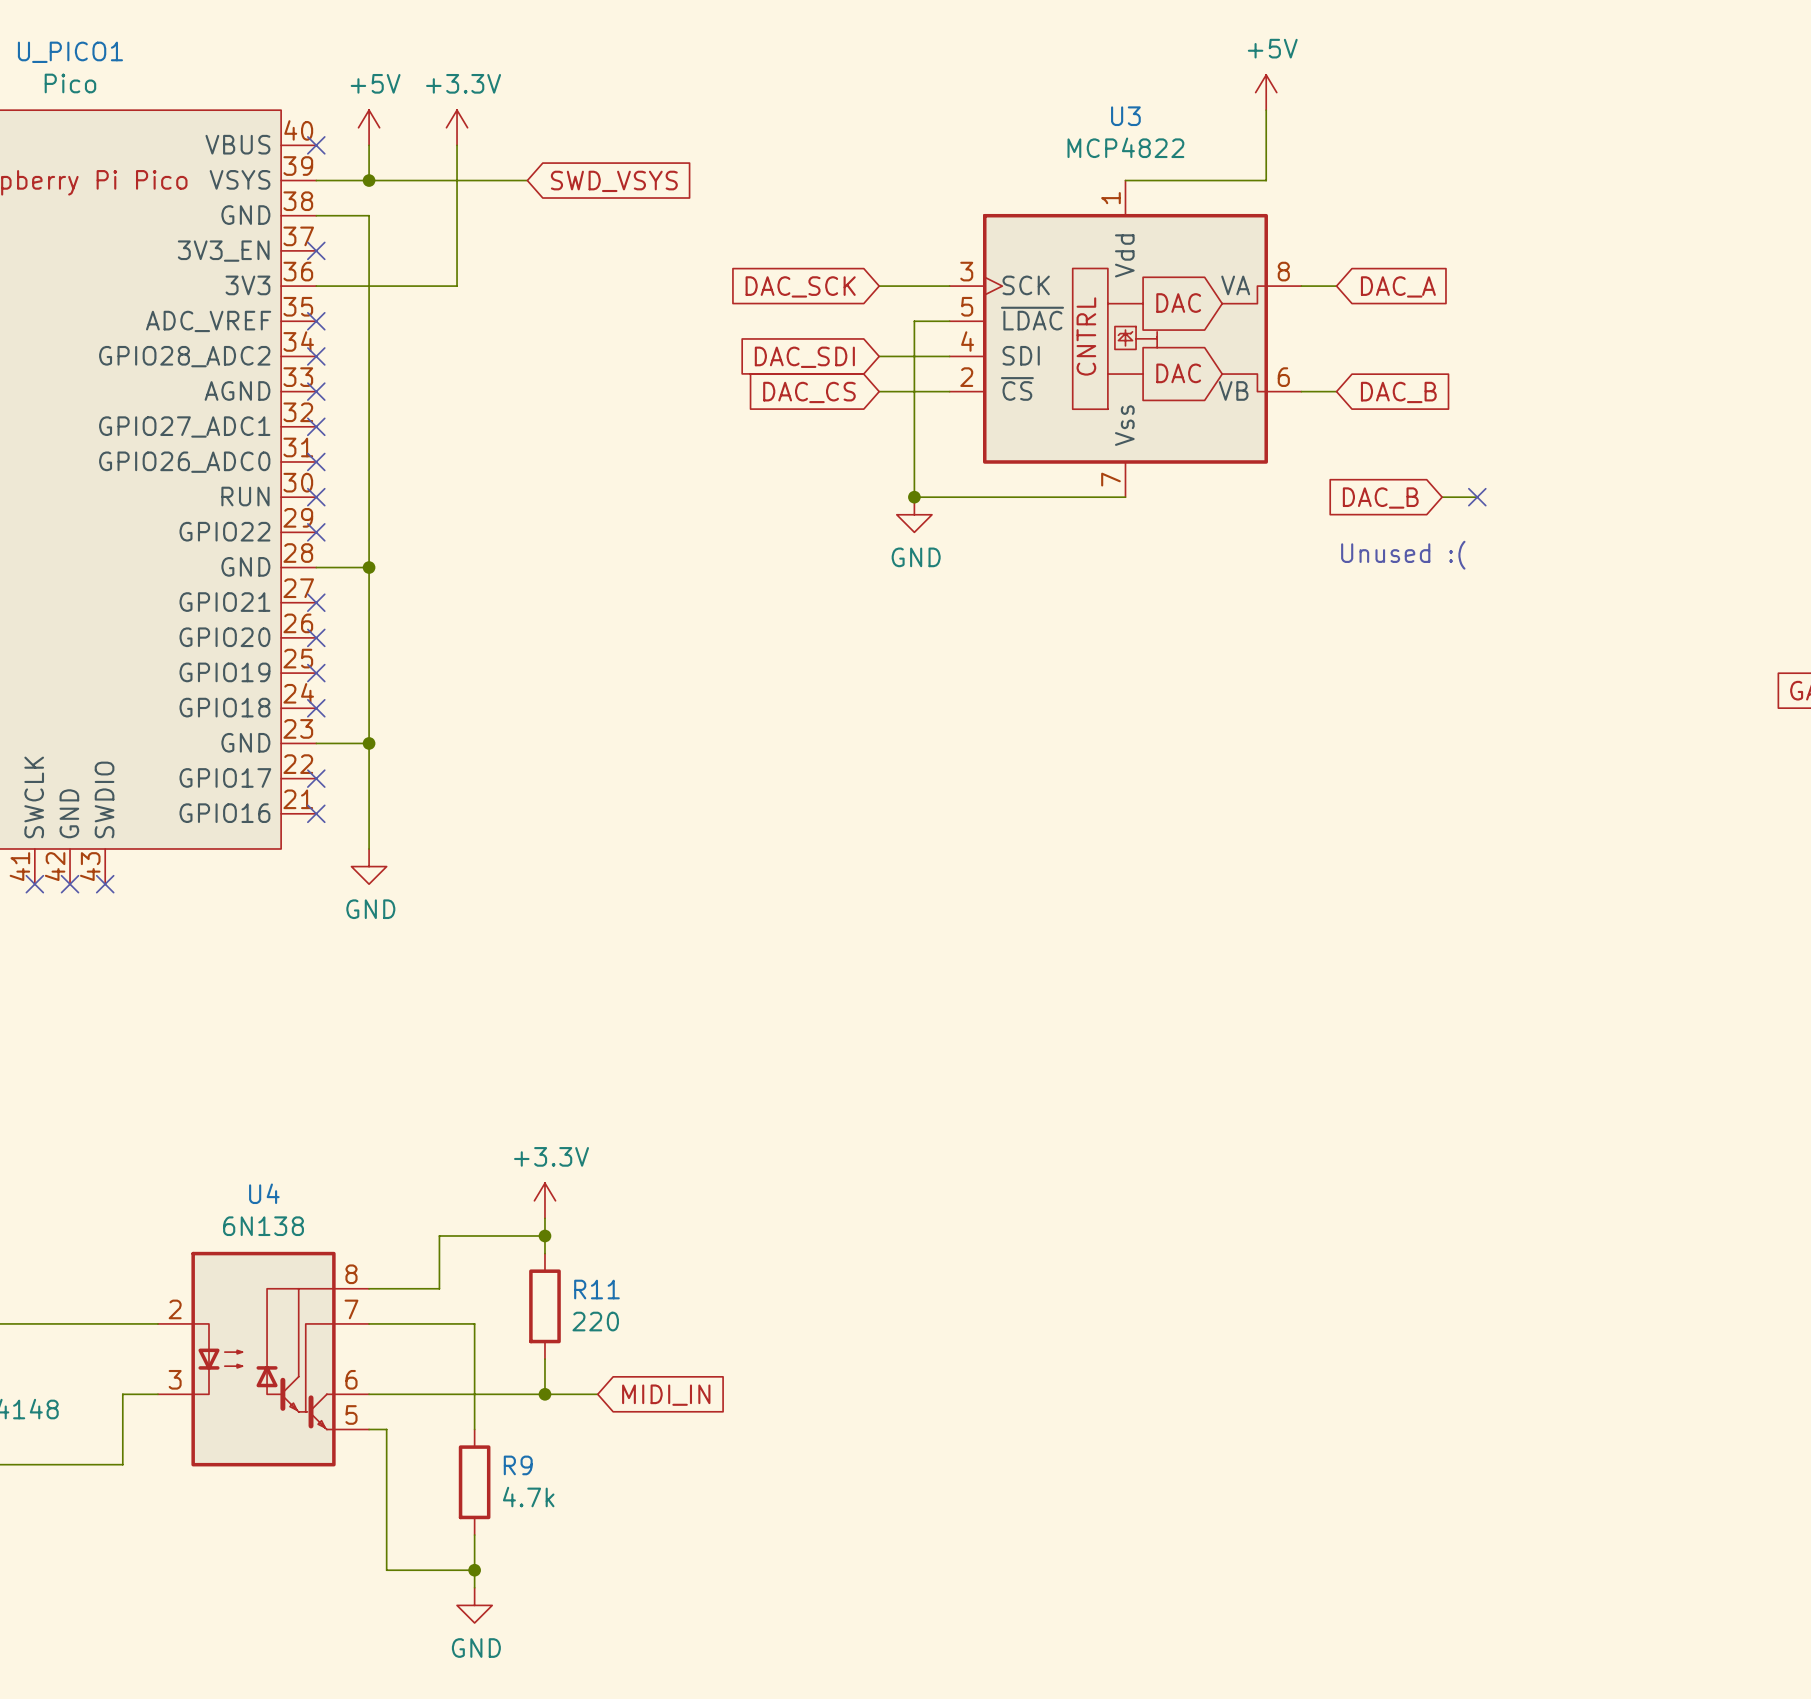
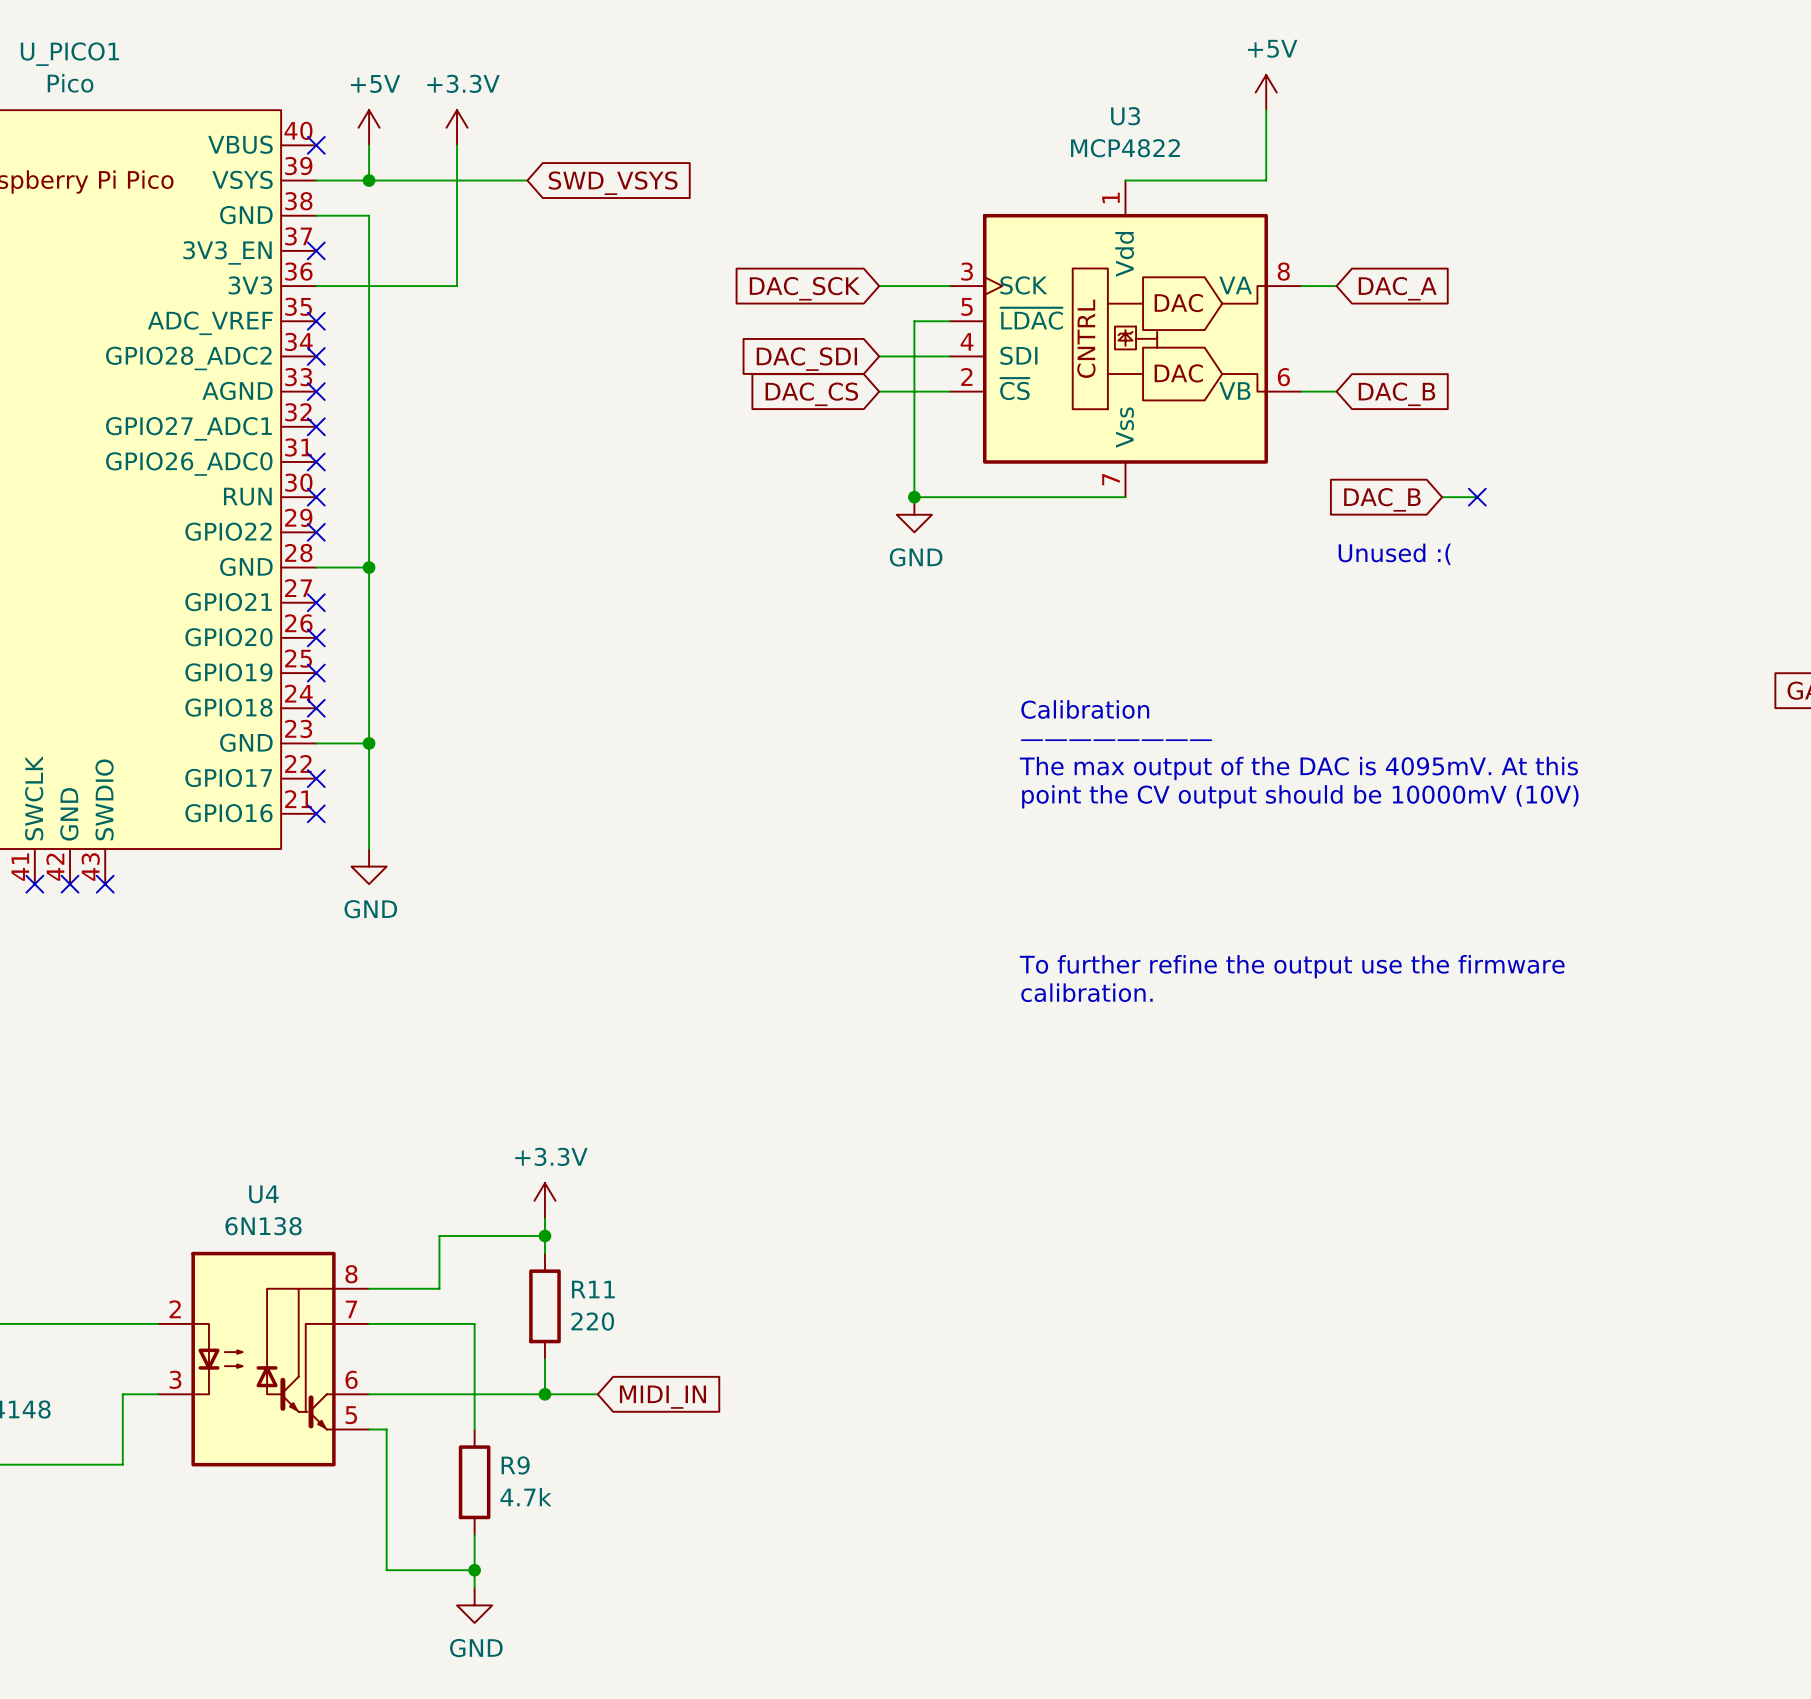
text: none -> Calibration (1085, 709)
text: none -> ———————— (1116, 740)
text: none -> The max output of the DAC is 4095mV. At this (1298, 768)
text: none -> point the CV output should be 10000mV (10V) (1300, 796)
text: none -> To further refine the output use the firmware (1292, 966)
text: none -> calibration. (1086, 992)

